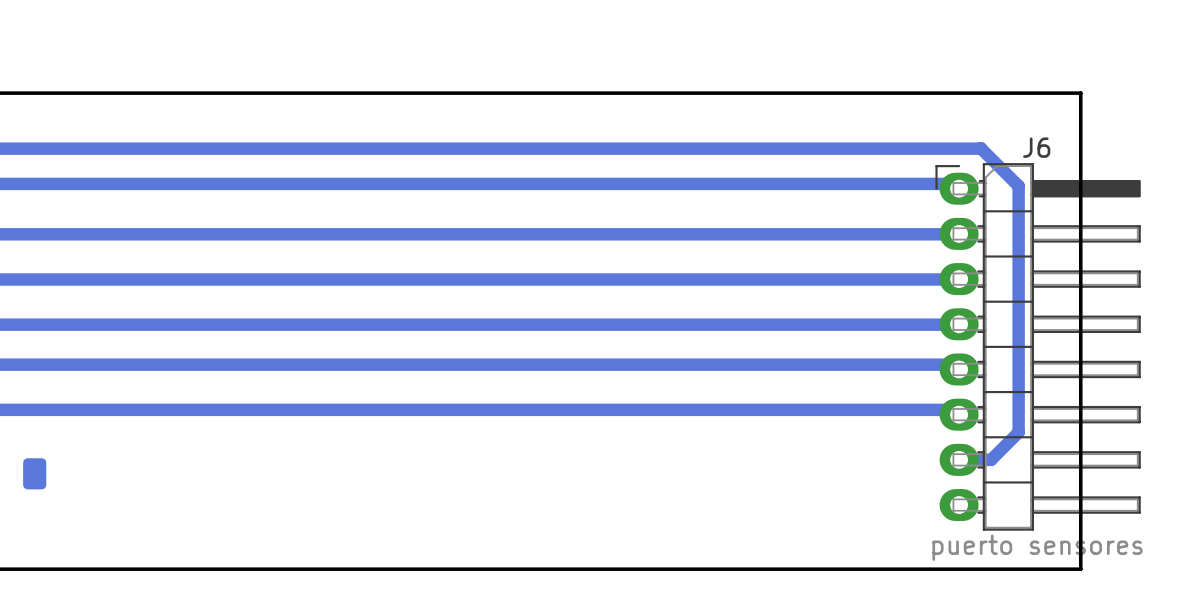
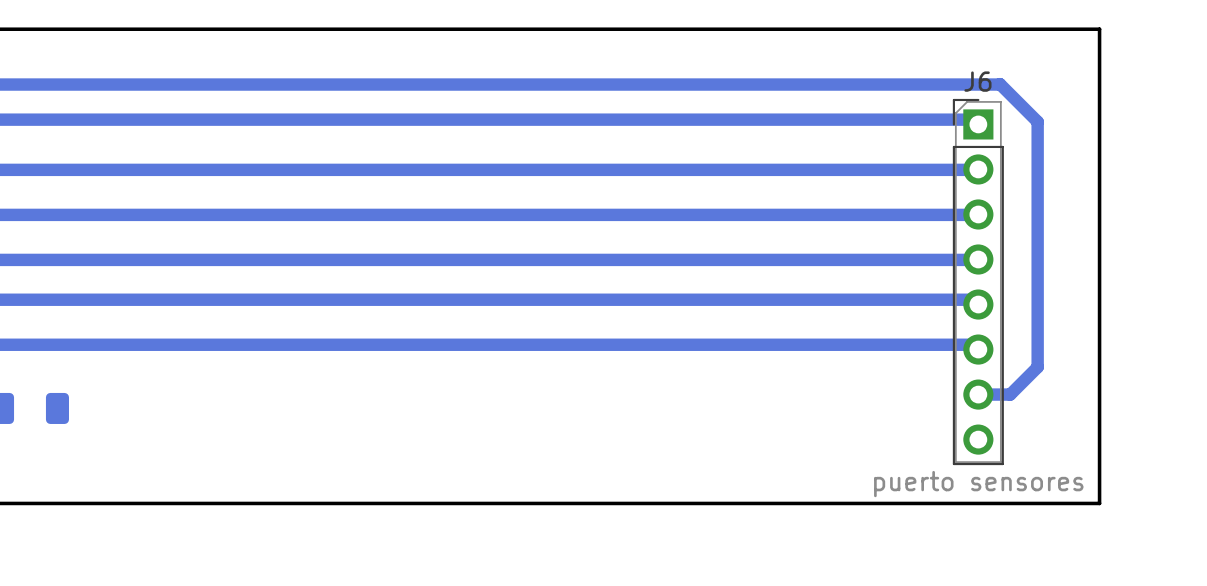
J6 footprint: [935, 163, 1141, 531] -> [952, 98, 1004, 466]

